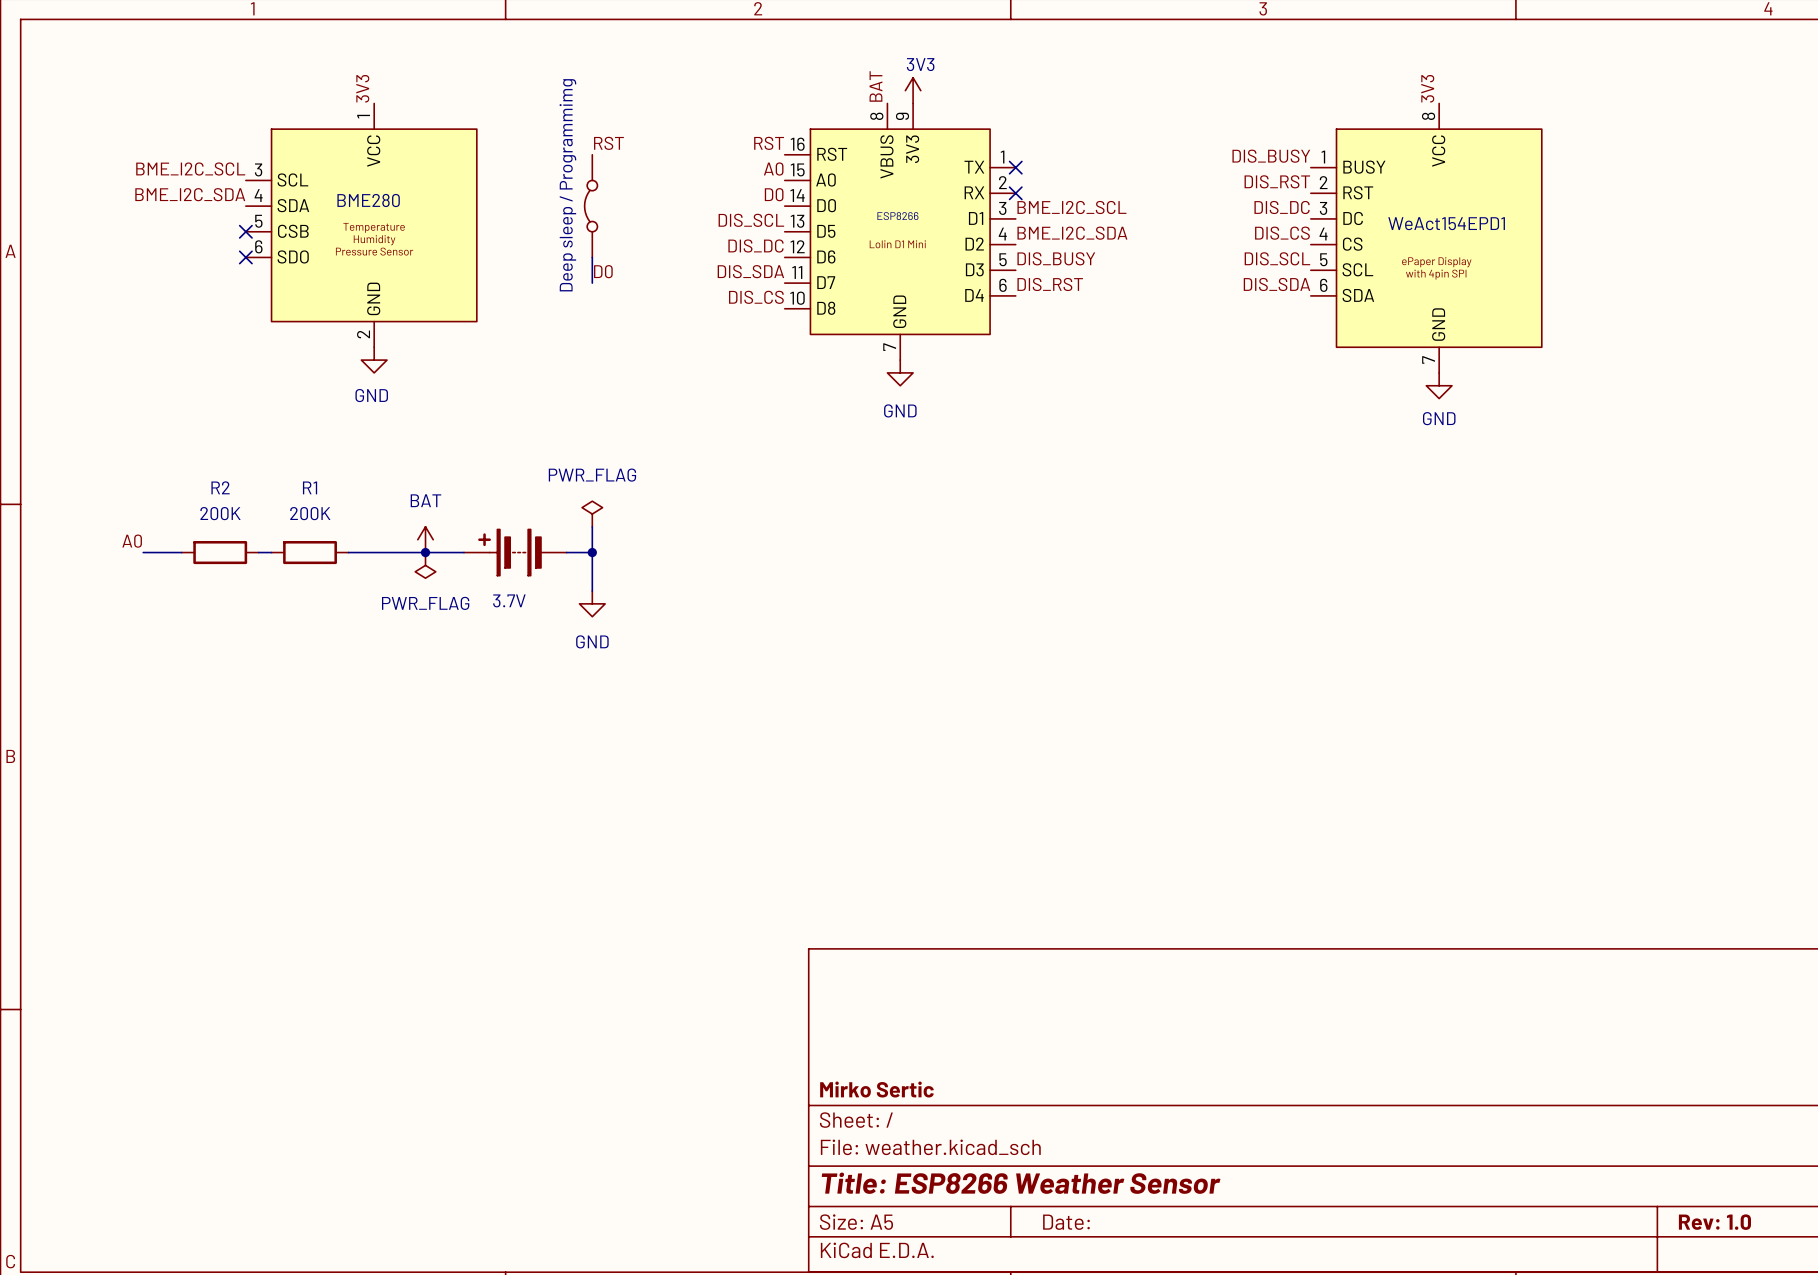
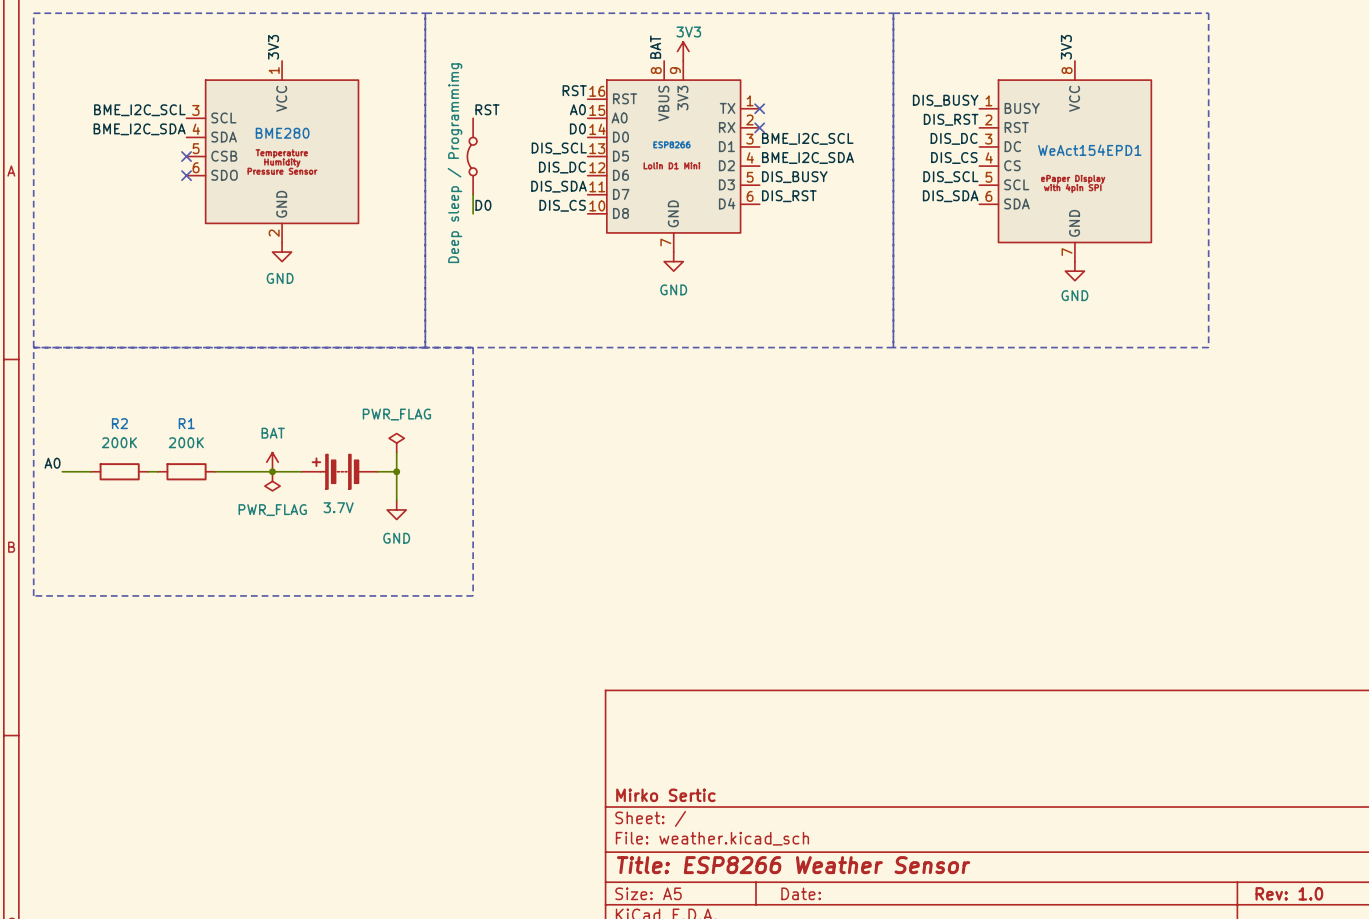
line: none -> (425, 13) (425, 347)
line: none -> (893, 13) (893, 347)
label position: RST (608, 143) -> RST (487, 109)
part position: (591, 206) -> (472, 156)
wire: (592, 257) (592, 283) -> (473, 194) (473, 213)
label position: D0 (603, 271) -> D0 (483, 205)
line: none -> (33, 347) (1208, 347) (1208, 13) (33, 13) (33, 595) (473, 595) (473, 347)
power symbol: PWR_FLAG (592, 514) -> none
wire: (592, 526) (592, 591) -> (396, 452) (396, 500)
power symbol position: BAT (425, 539) -> BAT (272, 462)
label position: A0 (132, 541) -> A0 (52, 463)
wire: (143, 552) (181, 552) -> (62, 471) (91, 471)
R2 position: (220, 552) -> (119, 471)
wire: (258, 552) (271, 552) -> (148, 471) (157, 471)
R1 position: (310, 552) -> (186, 471)
wire: (348, 552) (464, 552) -> (215, 471) (301, 471)
junction: (425, 552) -> none
part position: (515, 552) -> (339, 471)
wire: (566, 552) (592, 552) -> (377, 471) (396, 471)
junction: (592, 552) -> none
power symbol: PWR_FLAG (425, 565) -> none
power symbol position: GND (592, 603) -> GND (396, 509)
power symbol: none -> PWR_FLAG (396, 443)
junction: none -> (272, 471)
junction: none -> (396, 471)
power symbol: none -> PWR_FLAG (272, 481)

